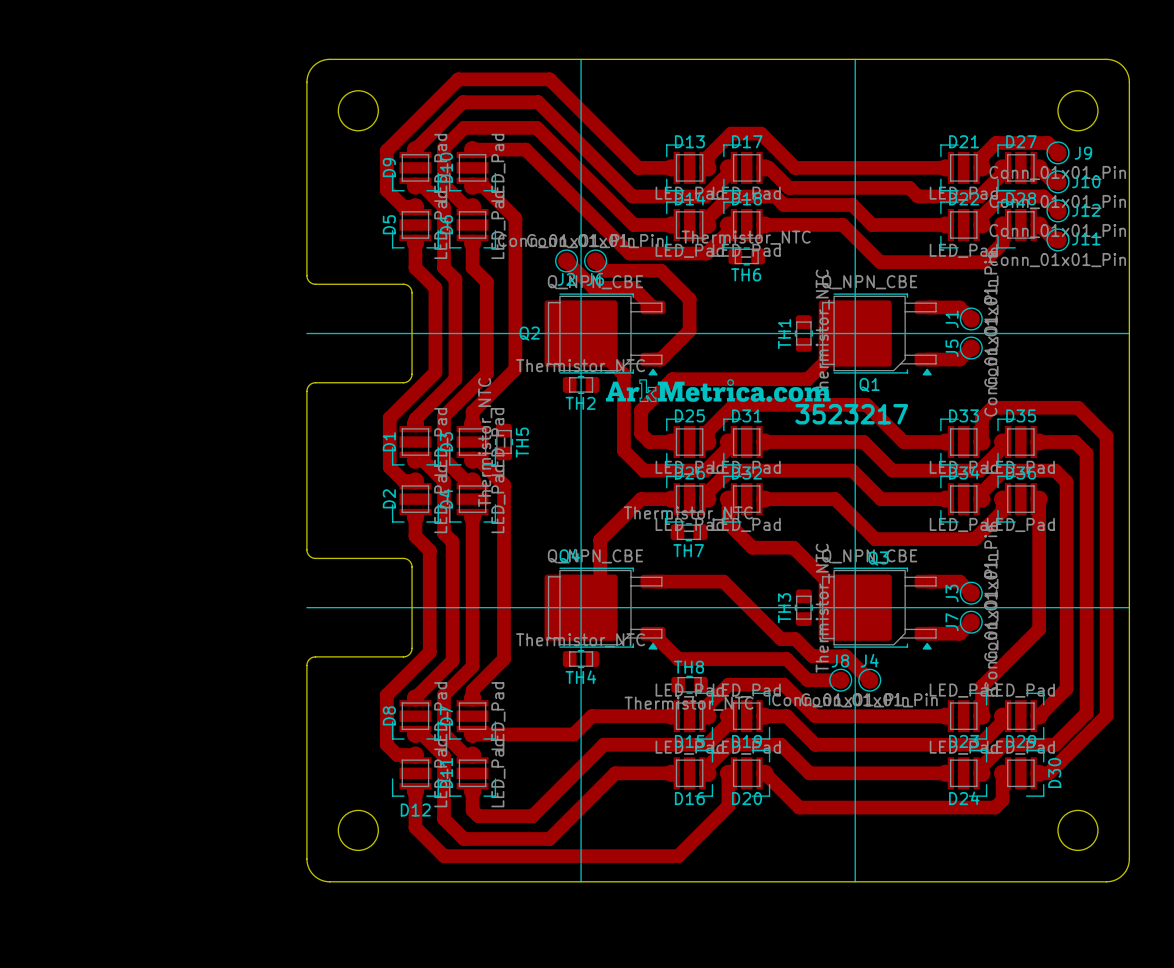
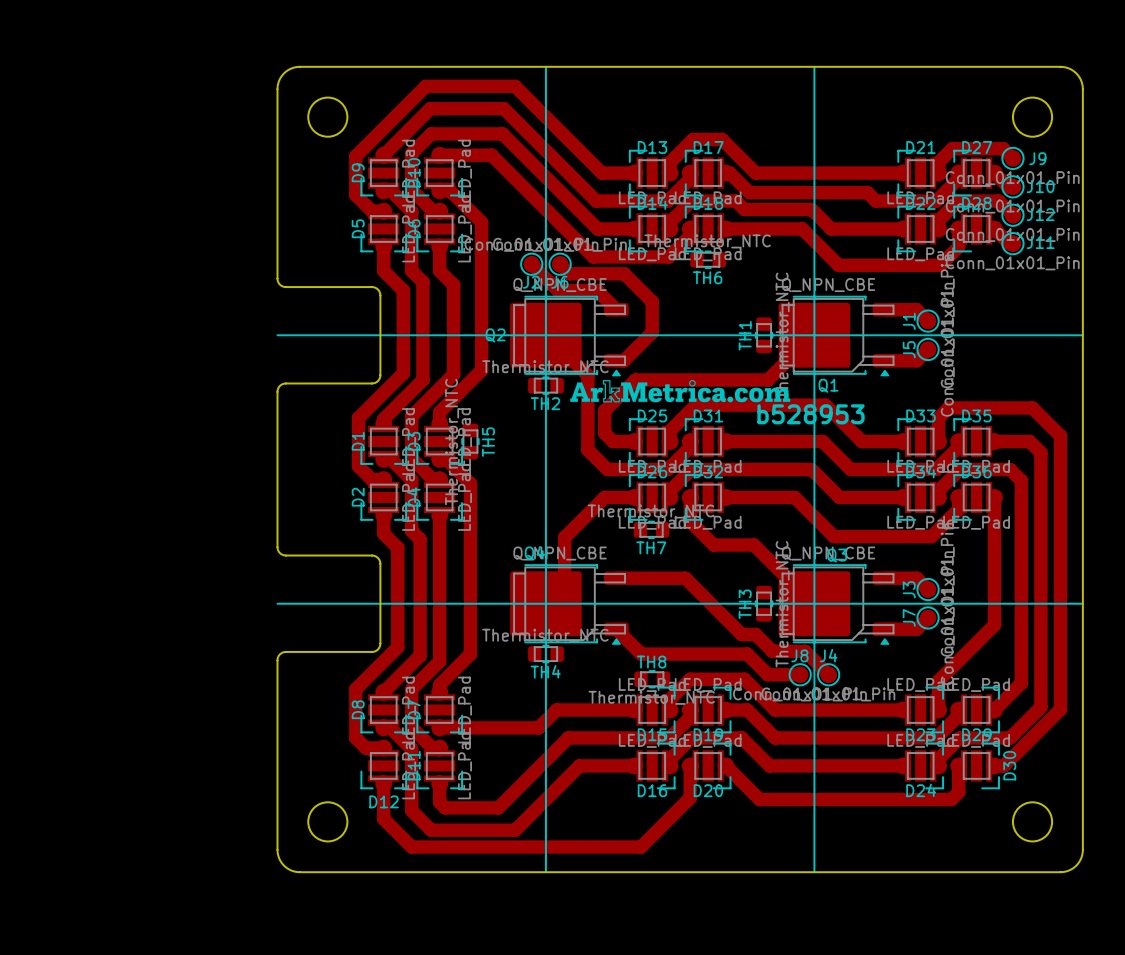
text: 3523217 (851, 414) -> b528953 (811, 414)

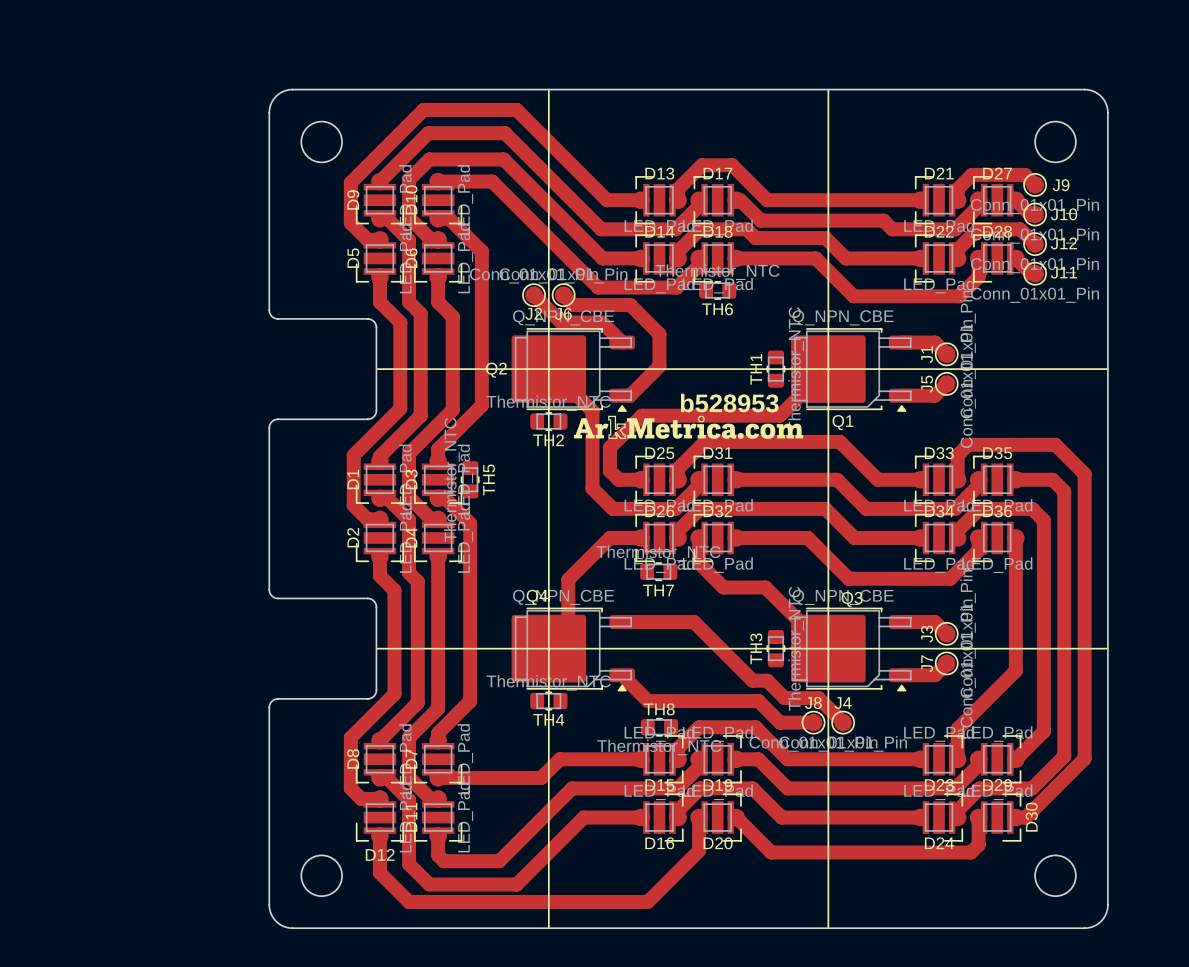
line: (277, 335) (380, 335) -> none
text position: b528953 (811, 414) -> b528953 (729, 403)
line: (277, 603) (380, 603) -> none

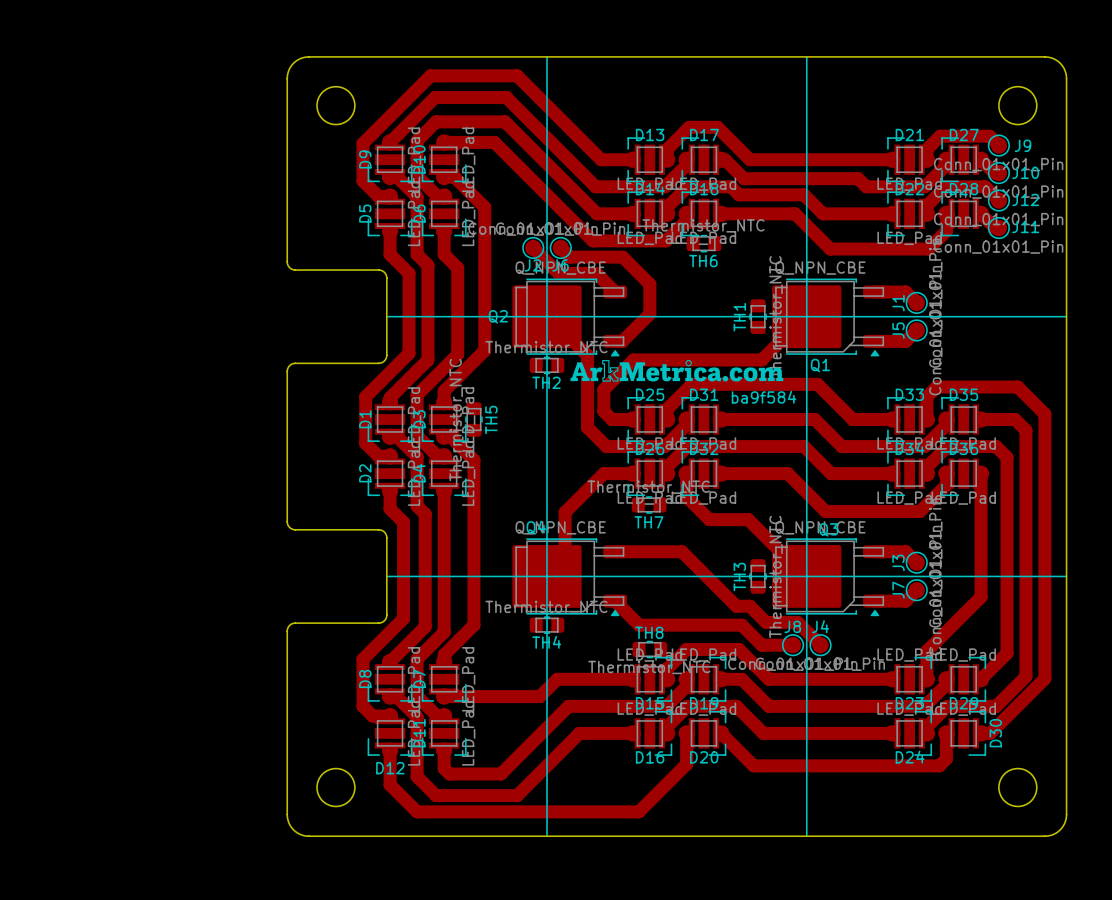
text: b528953 (729, 403) -> none
text: none -> ba9f584 (764, 397)

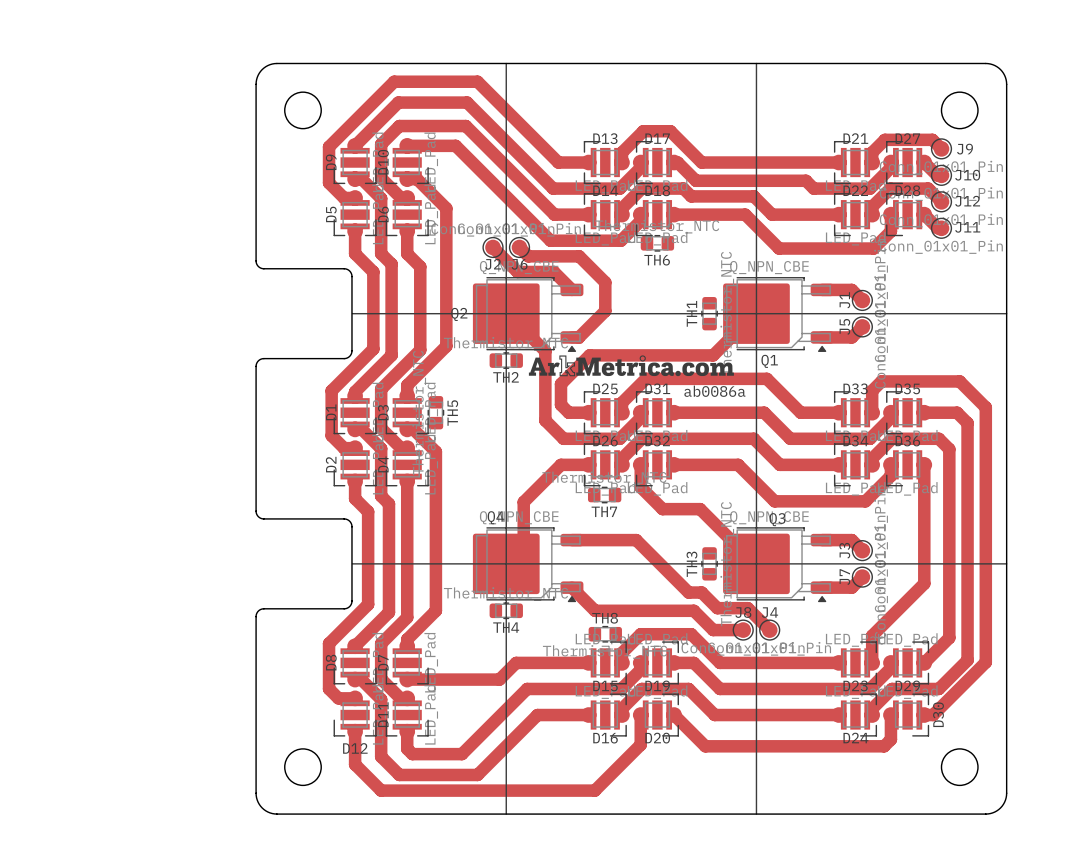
text: ba9f584 (764, 397) -> ab0086a (714, 391)

